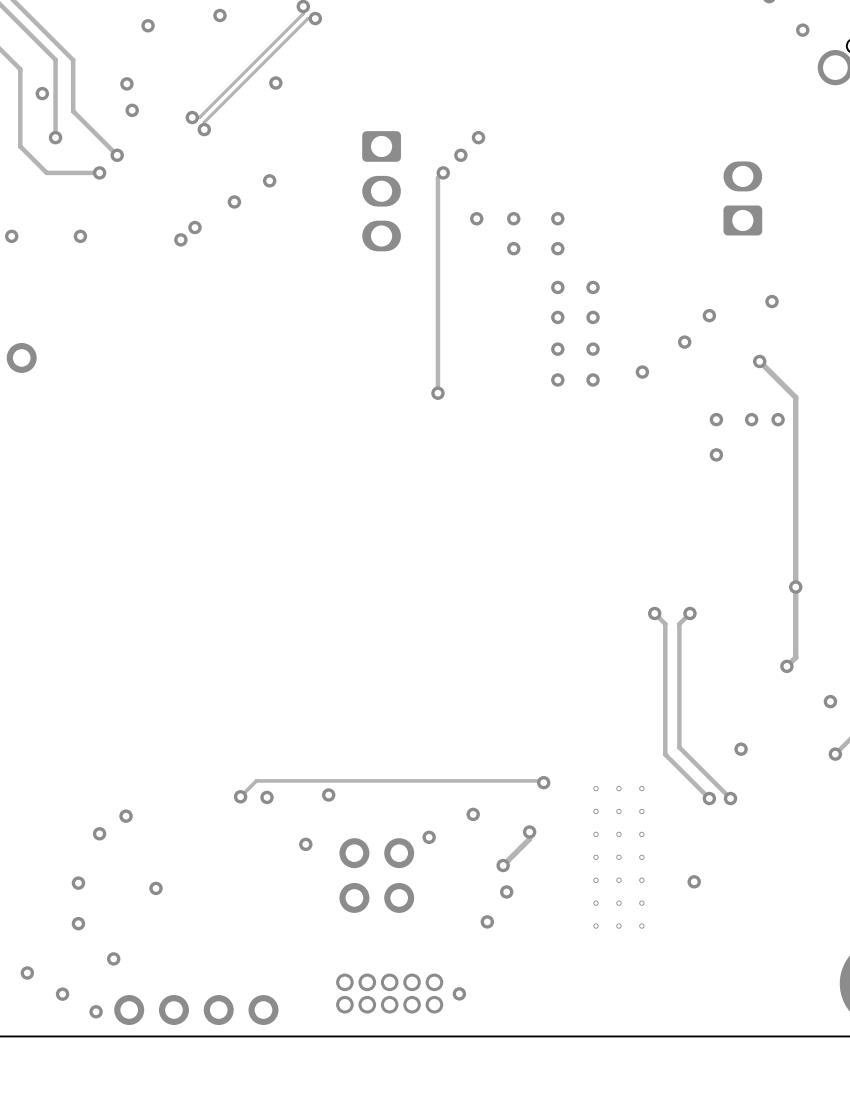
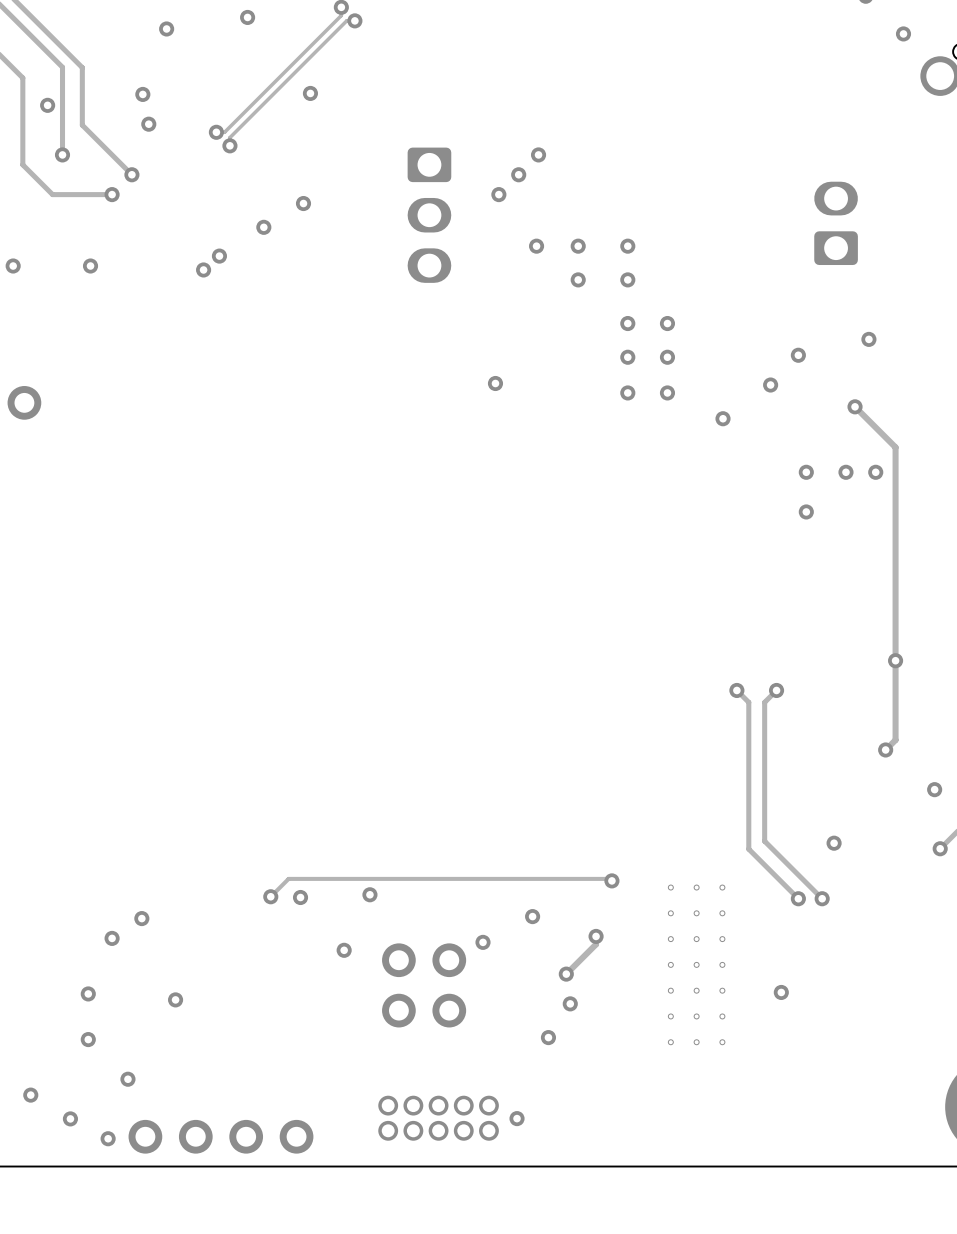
track: (443, 172) (437, 178) (437, 393) -> none
via: (557, 379) -> none
via: (593, 379) -> none
via position: (437, 393) -> (495, 383)

